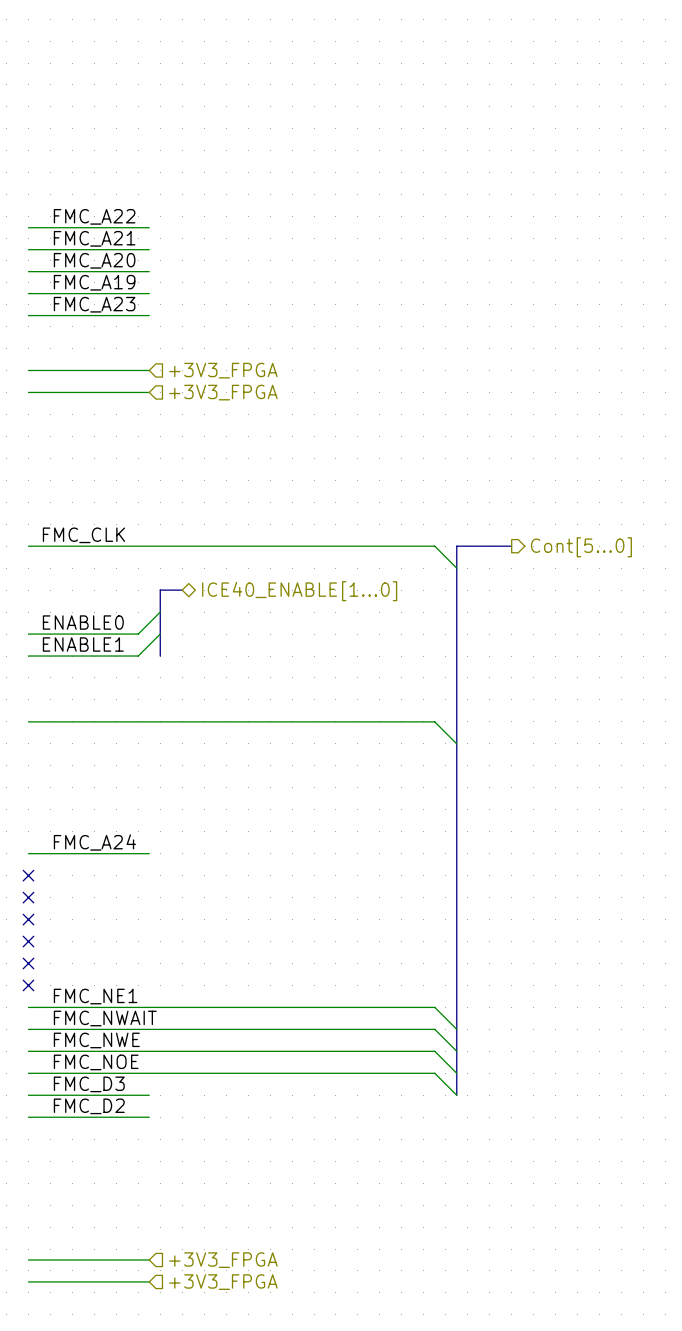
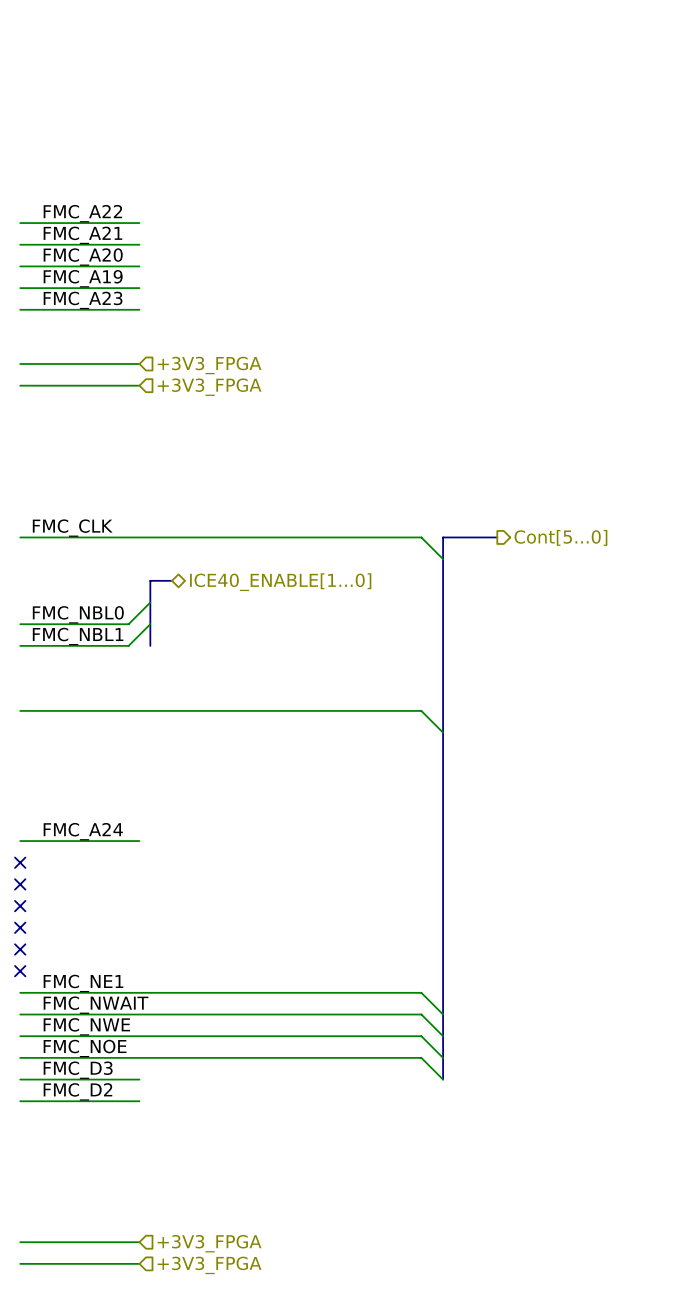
label: ENABLE0 (83, 622) -> FMC_NBL0 (78, 614)
label: ENABLE1 (83, 644) -> FMC_NBL1 (78, 636)

